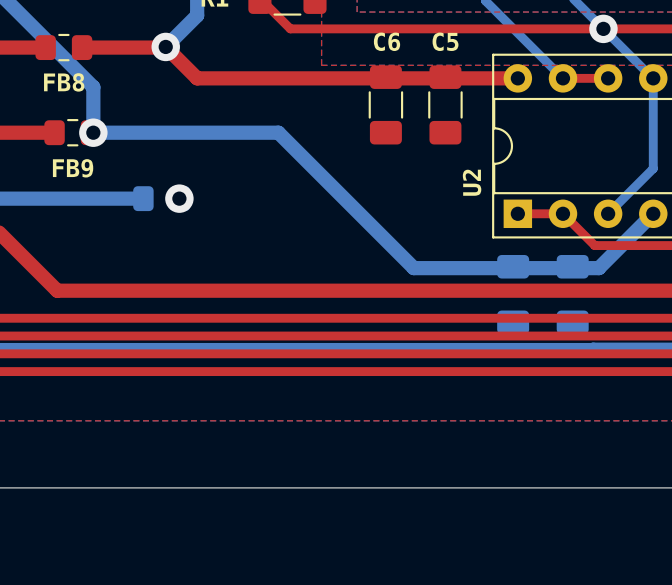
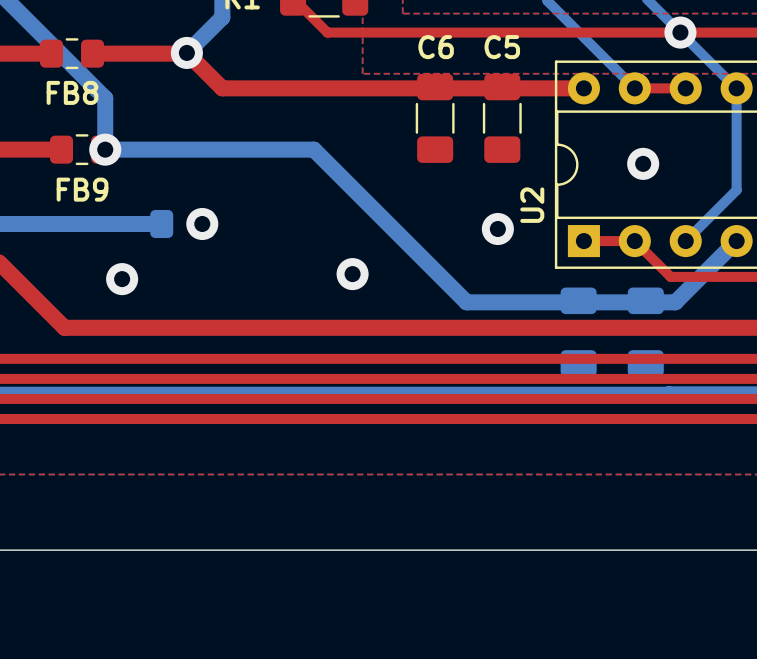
via: none -> (643, 163)
via: none -> (497, 229)
via: none -> (352, 274)
via: none -> (122, 279)

